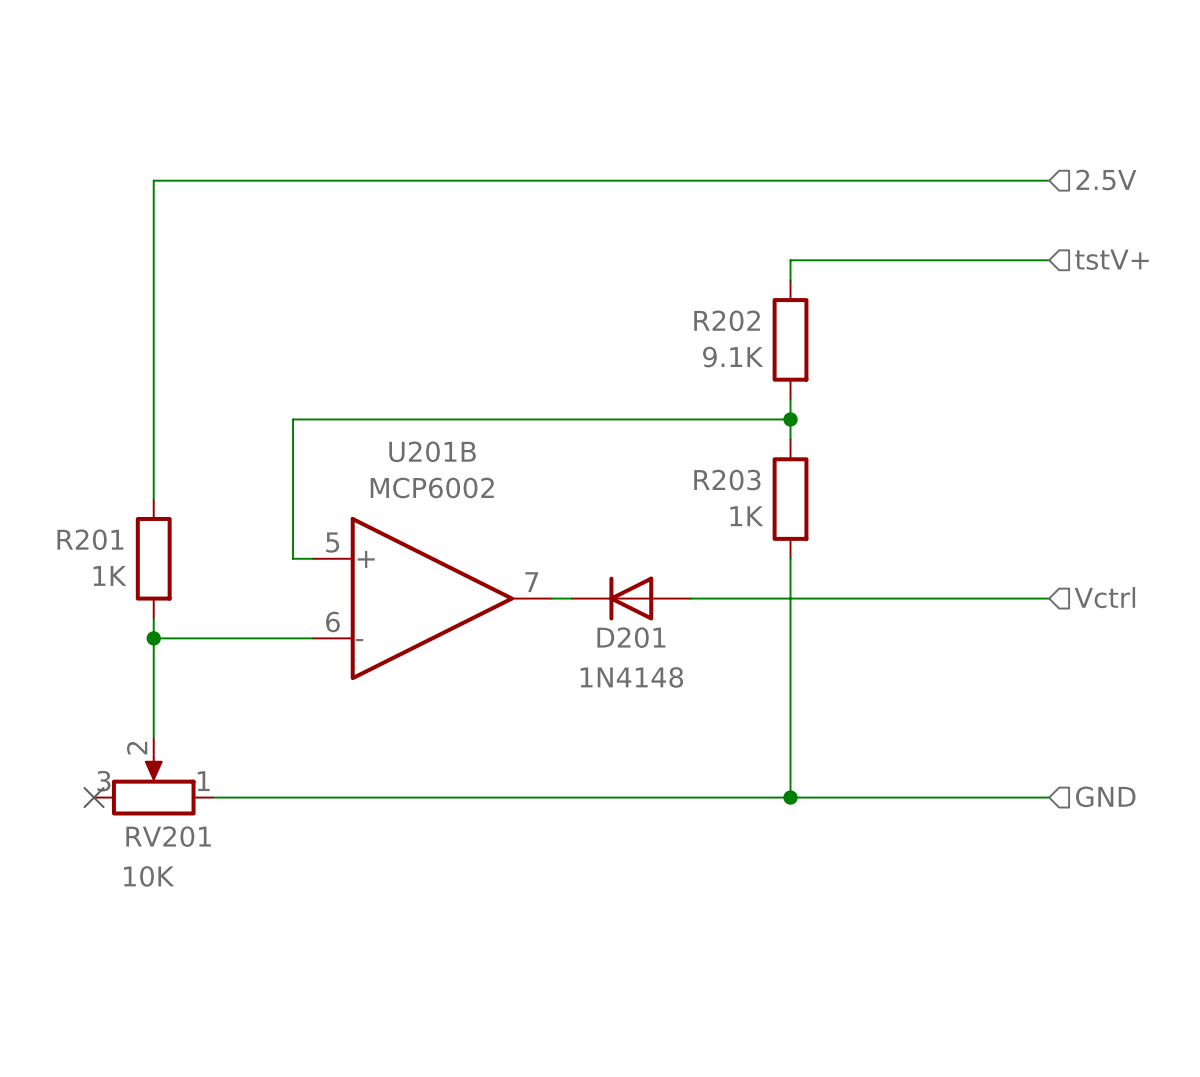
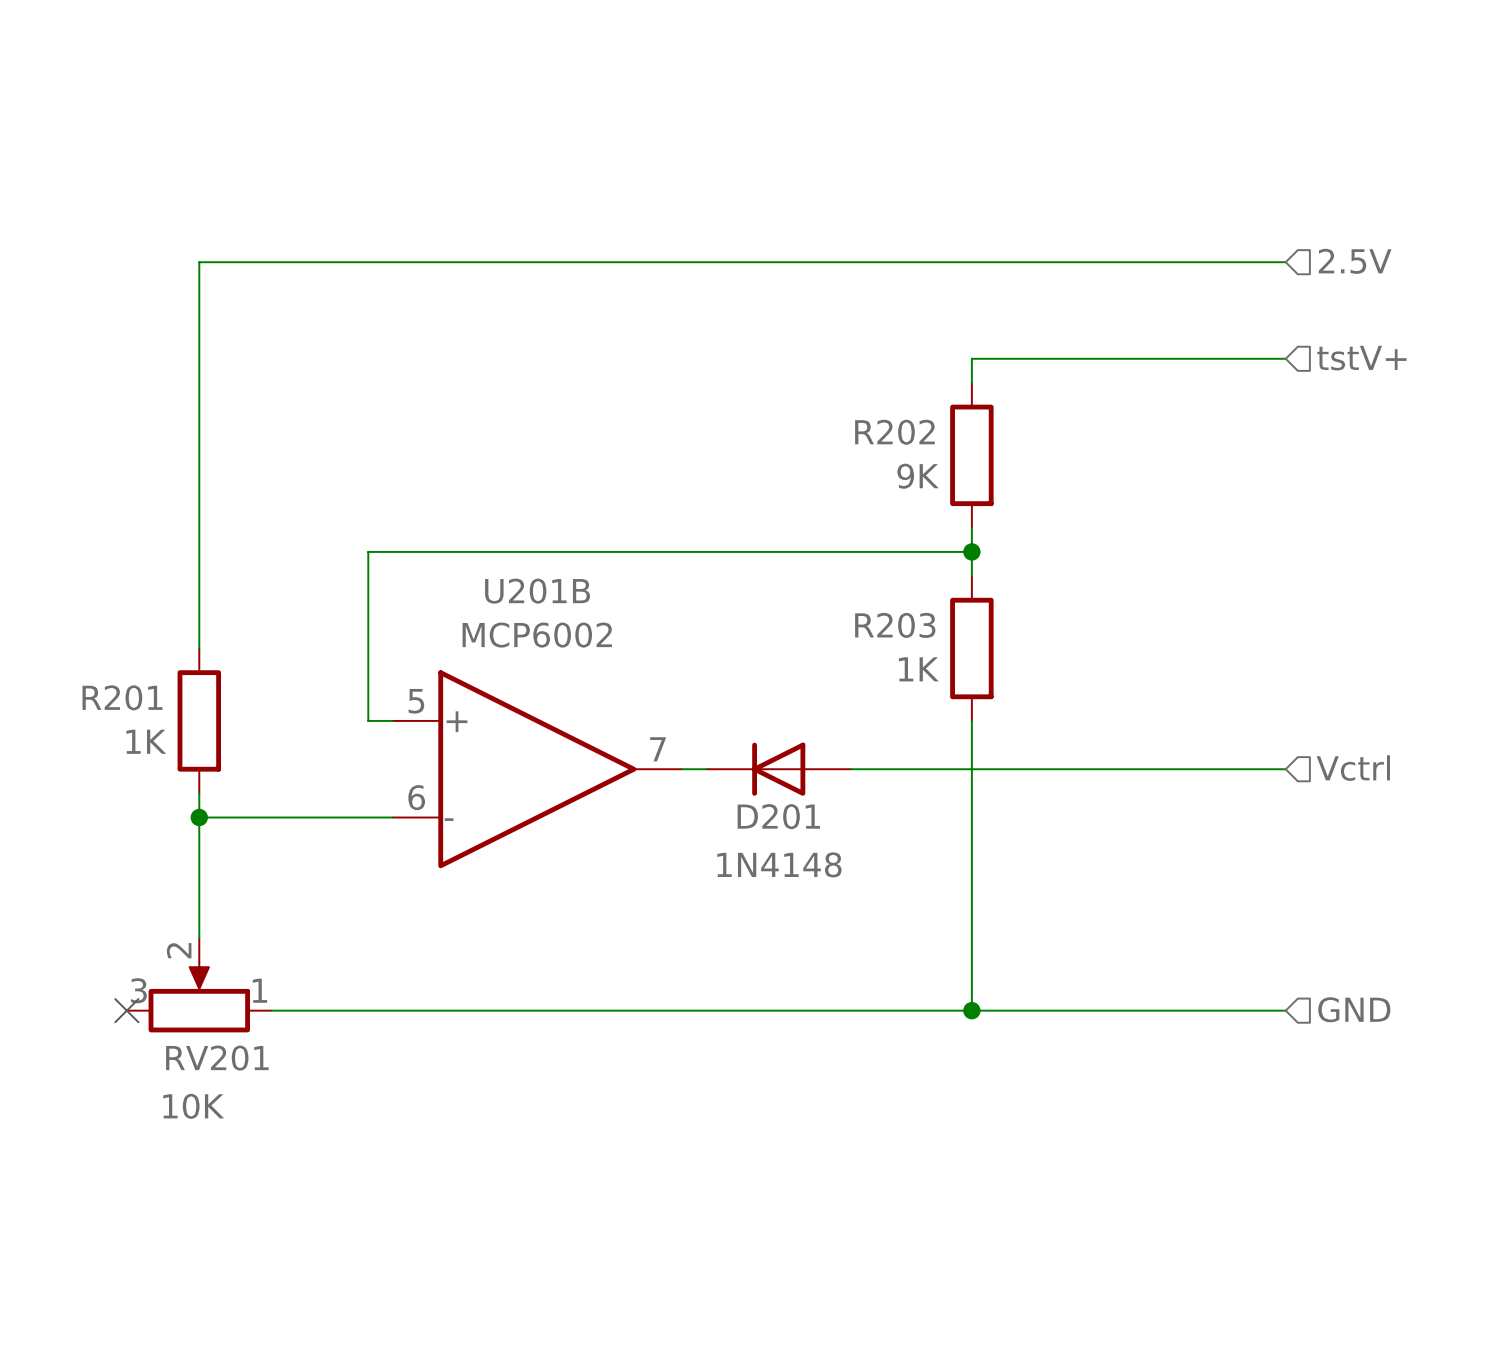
R202 value: 9.1K (733, 357) -> 9K (918, 476)

